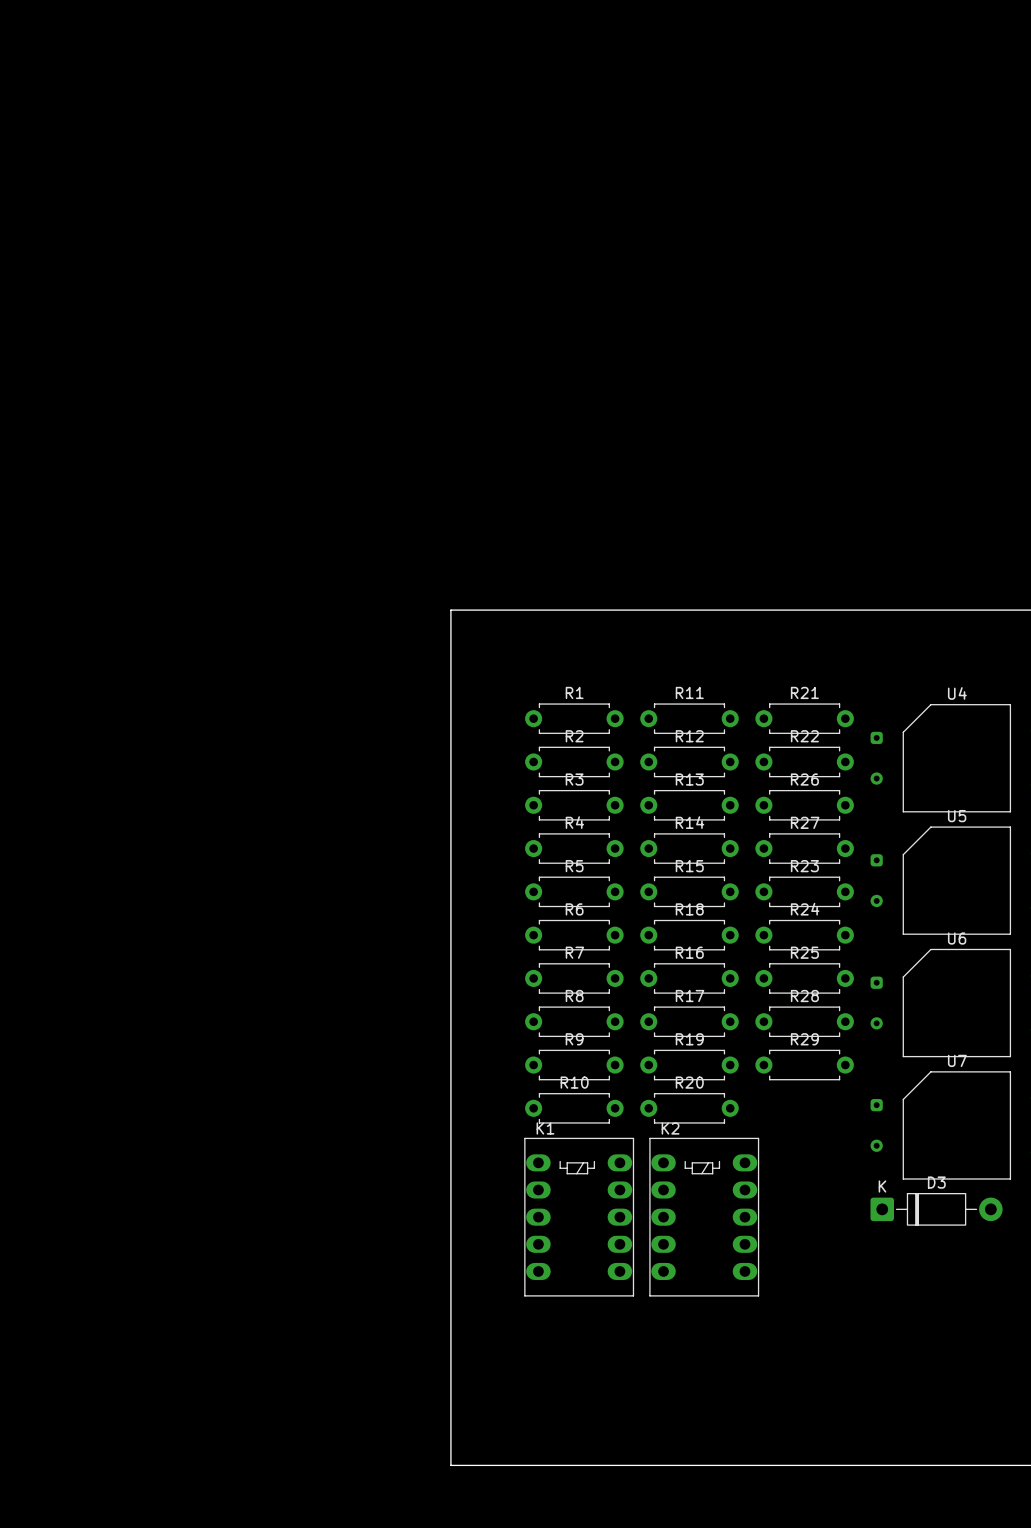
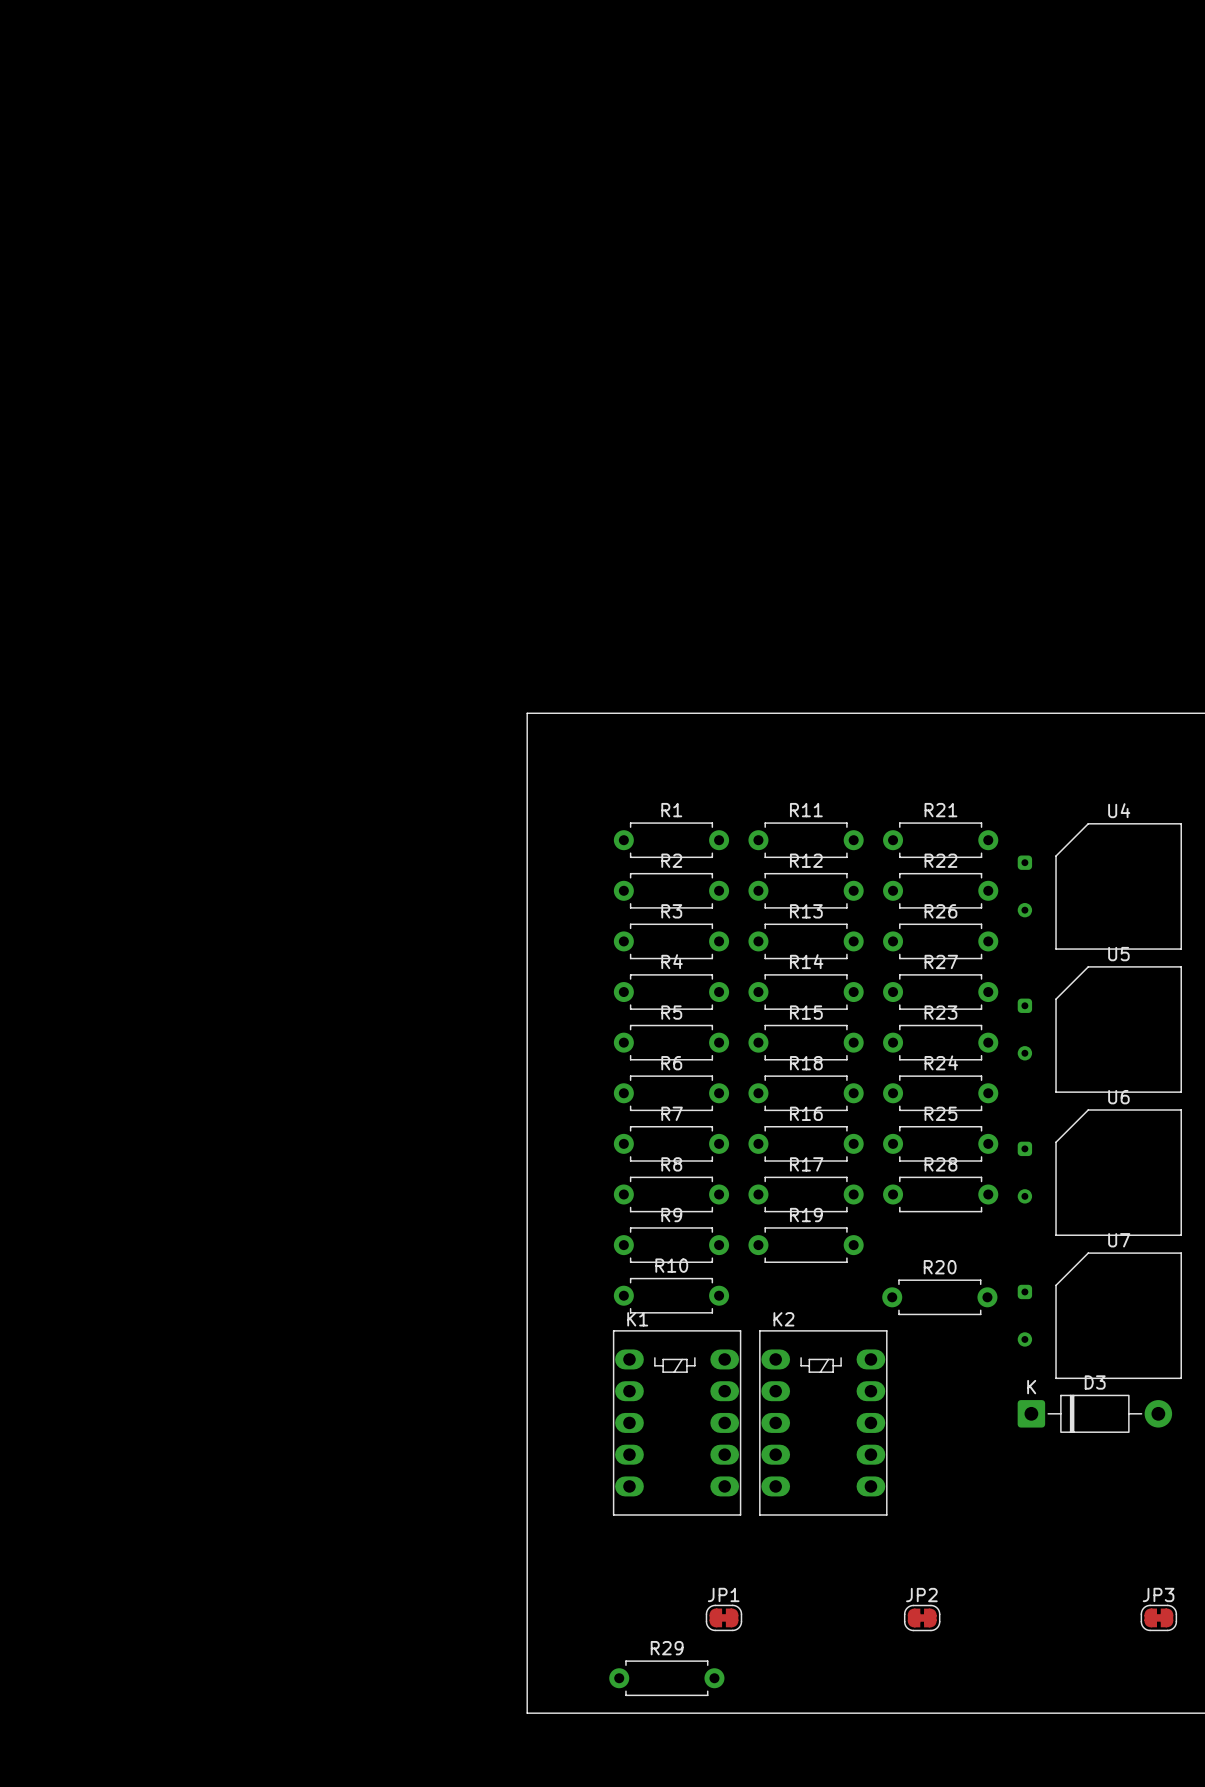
R29 position: (804, 1065) -> (666, 1678)
R20 position: (689, 1108) -> (939, 1297)
JP1: none -> (723, 1617)
JP3: none -> (1158, 1617)
JP2: none -> (922, 1618)

